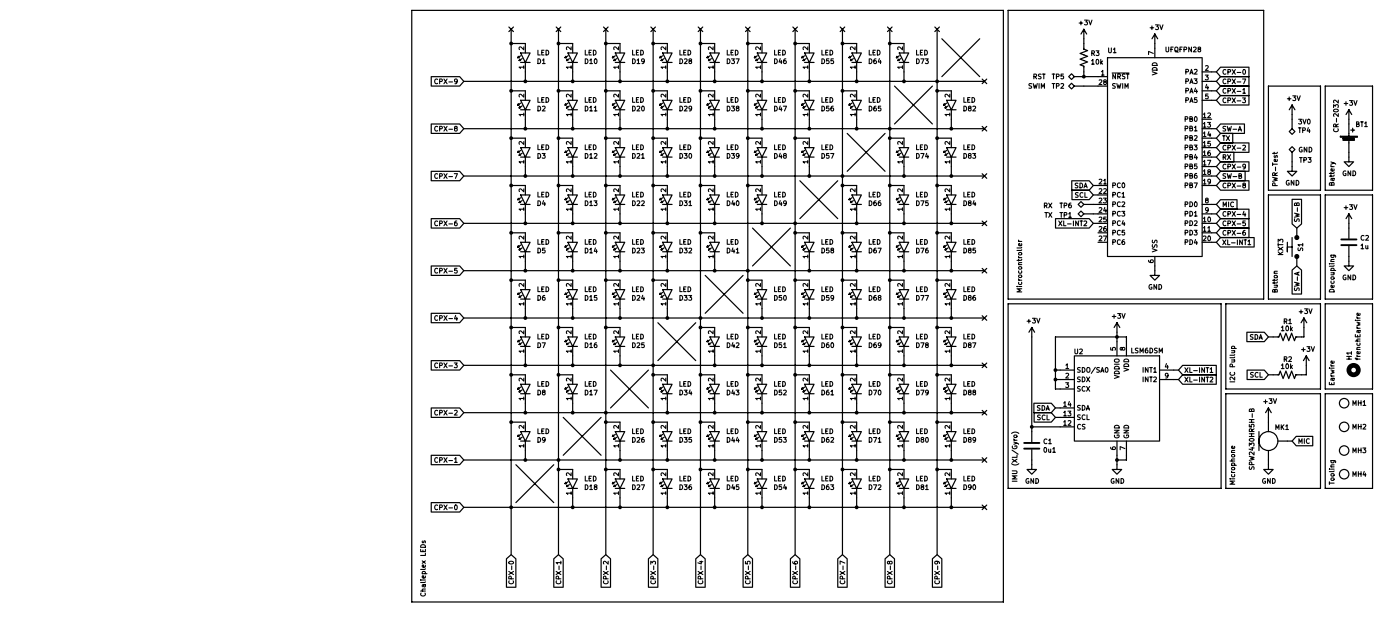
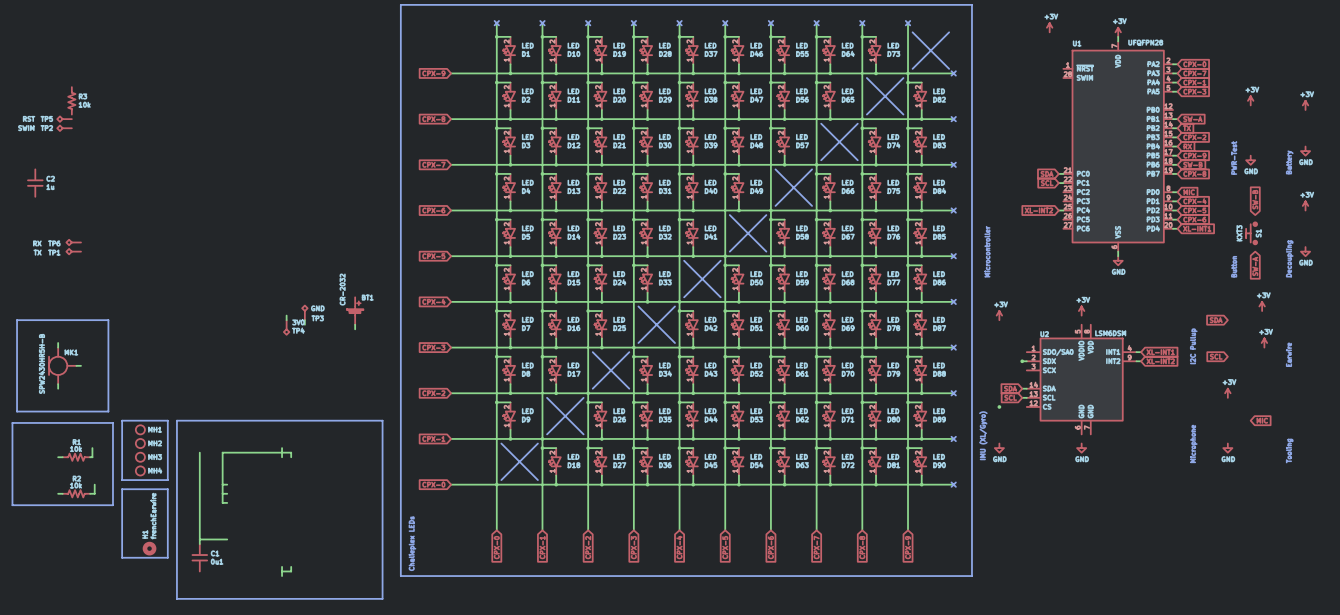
line: (1008, 10) (1263, 10) (1263, 299) (1008, 299) (1008, 10) -> none
wire: (1083, 38) (1083, 43) -> none
part position: (1083, 57) -> (71, 100)
wire: (1083, 71) (1083, 76) (1098, 76) -> none
part position: (1076, 76) -> (64, 119)
junction: (1083, 76) -> none
part position: (1076, 86) -> (64, 128)
wire: (1083, 86) (1098, 86) -> none
line: (1268, 86) (1268, 190) (1320, 190) (1320, 86) (1268, 86) -> none
line: (1325, 86) (1372, 86) (1372, 190) (1325, 190) (1325, 86) -> none
wire: (1292, 114) (1292, 119) -> none
wire: (1348, 119) (1348, 123) -> none
part position: (1292, 126) -> (286, 327)
part position: (1348, 138) -> (355, 311)
wire: (1348, 152) (1348, 157) -> none
part position: (1292, 154) -> (304, 312)
wire: (1292, 161) (1292, 166) -> none
line: (1268, 194) (1268, 299) (1320, 299) (1320, 194) (1268, 194) -> none
line: (1325, 194) (1372, 194) (1372, 299) (1325, 299) (1325, 194) -> none
part position: (1085, 204) -> (73, 242)
wire: (1093, 204) (1098, 204) -> none
part position: (1085, 213) -> (73, 251)
wire: (1093, 213) (1098, 213) -> none
wire: (1348, 223) (1348, 228) -> none
wire: (1296, 228) (1296, 237) -> none
part position: (1348, 242) -> (35, 183)
wire: (1296, 256) (1296, 265) -> none
wire: (1348, 256) (1348, 261) -> none
line: (1008, 303) (1008, 488) (1221, 488) (1221, 303) (1008, 303) -> none
line: (1225, 303) (1320, 303) (1320, 389) (1225, 389) (1225, 303) -> none
line: (1325, 303) (1325, 389) (1372, 389) (1372, 303) (1325, 303) -> none
wire: (1303, 327) (1303, 336) (1301, 336) -> none
wire: none -> (286, 315) (286, 320)
wire: (1116, 332) (1116, 341) -> none
line: none -> (17, 320) (17, 411) (108, 411) (108, 320) (17, 320)
wire: none -> (304, 320) (304, 324)
wire: (1031, 336) (1031, 431) -> none
junction: (1116, 336) -> none
wire: (1268, 336) (1273, 336) -> none
part position: (1287, 336) -> (76, 457)
wire: none -> (355, 324) (355, 329)
wire: (1126, 341) (1126, 336) (1055, 336) (1055, 389) (1060, 389) -> none
wire: none -> (58, 343) (58, 347)
wire: (1306, 365) (1306, 374) (1301, 374) -> none
wire: (1055, 370) (1060, 370) -> none
junction: (1055, 370) -> none
part position: (1353, 370) -> (149, 548)
wire: (1268, 374) (1273, 374) -> none
part position: (1287, 374) -> (76, 493)
wire: none -> (76, 365) (81, 365)
line: (1225, 393) (1225, 488) (1320, 488) (1320, 393) (1225, 393) -> none
line: (1325, 393) (1372, 393) (1372, 488) (1325, 488) (1325, 393) -> none
wire: none -> (58, 384) (58, 388)
part position: (1344, 403) -> (140, 429)
wire: (1268, 417) (1268, 422) -> none
part symbol: [1258, 422, 1288, 461] -> [49, 347, 77, 385]
wire: (1031, 426) (1060, 426) -> none
part position: (1344, 426) -> (140, 443)
line: none -> (122, 420) (122, 480) (167, 480) (167, 420) (122, 420)
line: none -> (176, 420) (176, 598) (382, 598) (382, 420) (176, 420)
wire: (1287, 441) (1292, 441) -> none
line: none -> (12, 422) (112, 422) (112, 505) (12, 505) (12, 422)
part position: (1031, 445) -> (199, 557)
part position: (1344, 450) -> (140, 457)
wire: (1116, 455) (1116, 464) -> none
wire: (1126, 455) (1126, 460) (1116, 460) -> none
wire: (1031, 460) (1031, 464) -> none
junction: (1116, 460) -> none
wire: (1268, 460) (1268, 464) -> none
wire: none -> (92, 448) (92, 457) (90, 457)
wire: none -> (282, 448) (282, 457)
wire: none -> (199, 452) (199, 544)
part position: (1344, 474) -> (140, 470)
wire: none -> (58, 457) (62, 457)
wire: none -> (291, 457) (291, 452) (222, 452) (222, 502) (227, 502)
wire: none -> (94, 484) (94, 493) (90, 493)
wire: none -> (222, 484) (227, 484)
line: none -> (122, 489) (122, 557) (167, 557) (167, 489) (122, 489)
wire: none -> (58, 493) (62, 493)
wire: none -> (222, 493) (227, 493)
wire: none -> (199, 539) (227, 539)
wire: none -> (282, 566) (282, 576)
wire: none -> (291, 566) (291, 571) (282, 571)

